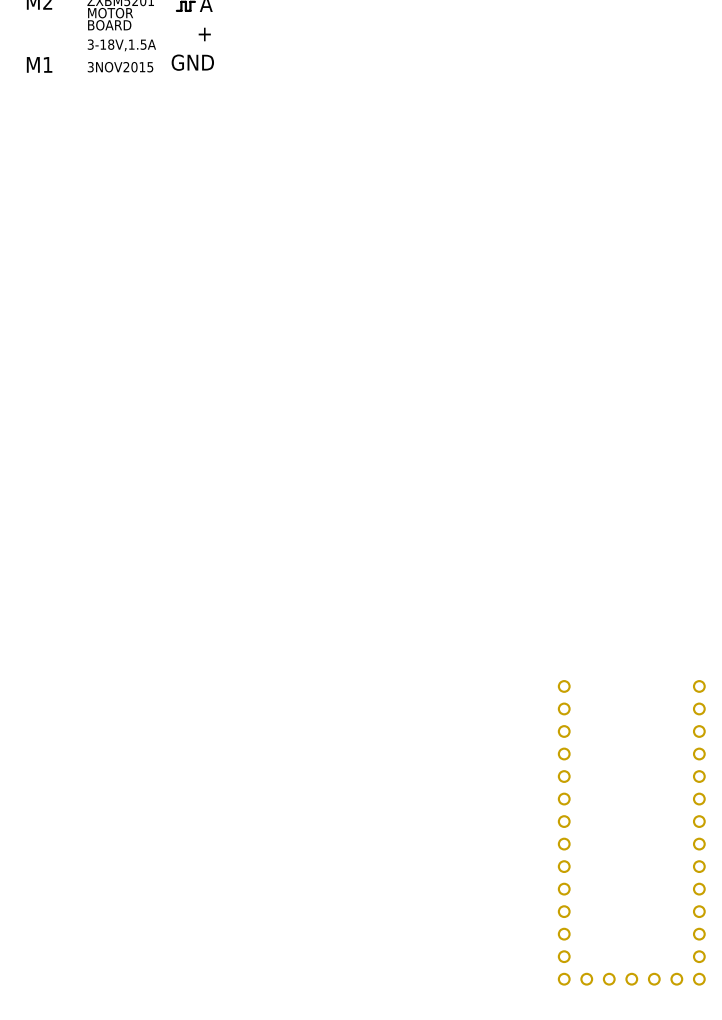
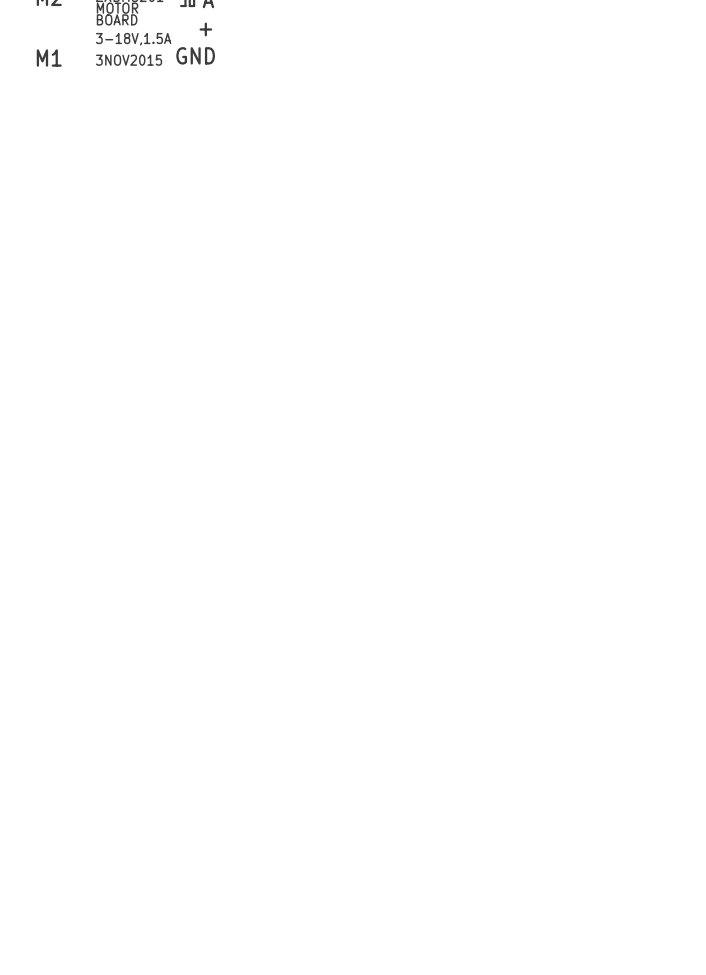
part: (631, 832) -> none

